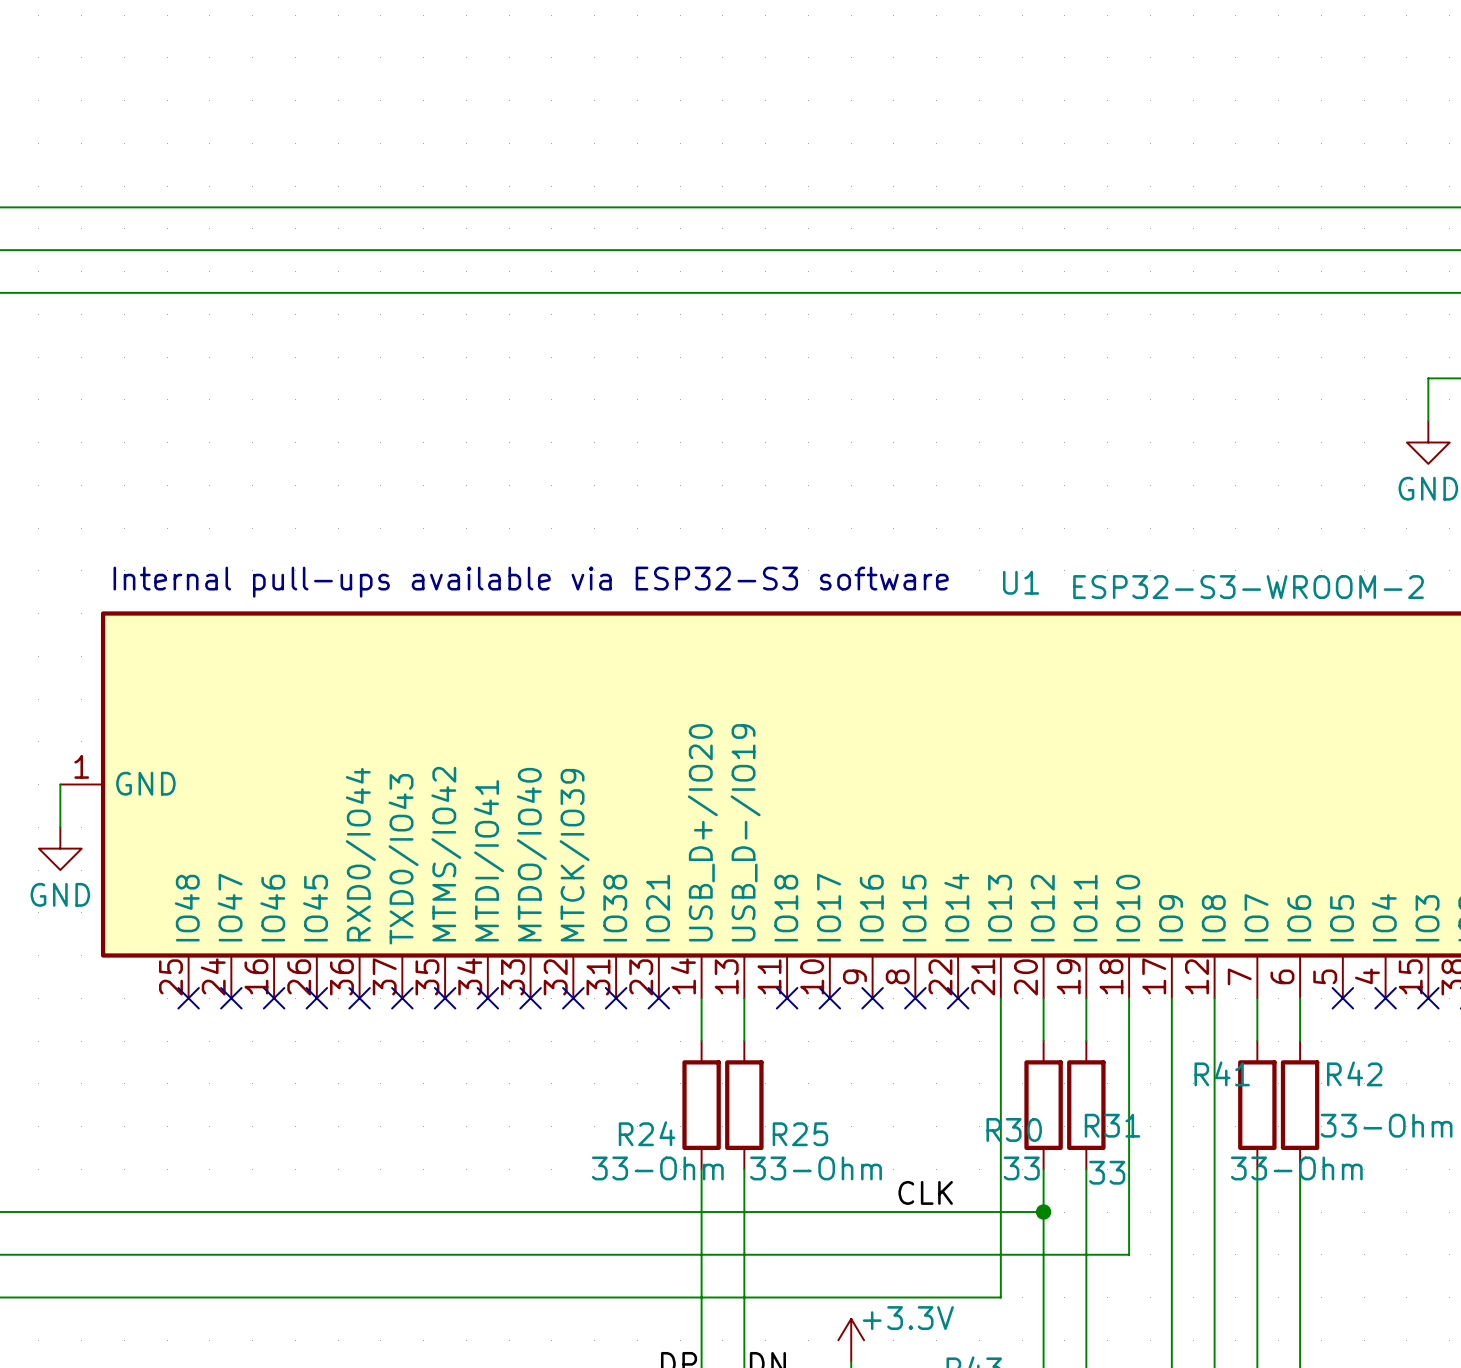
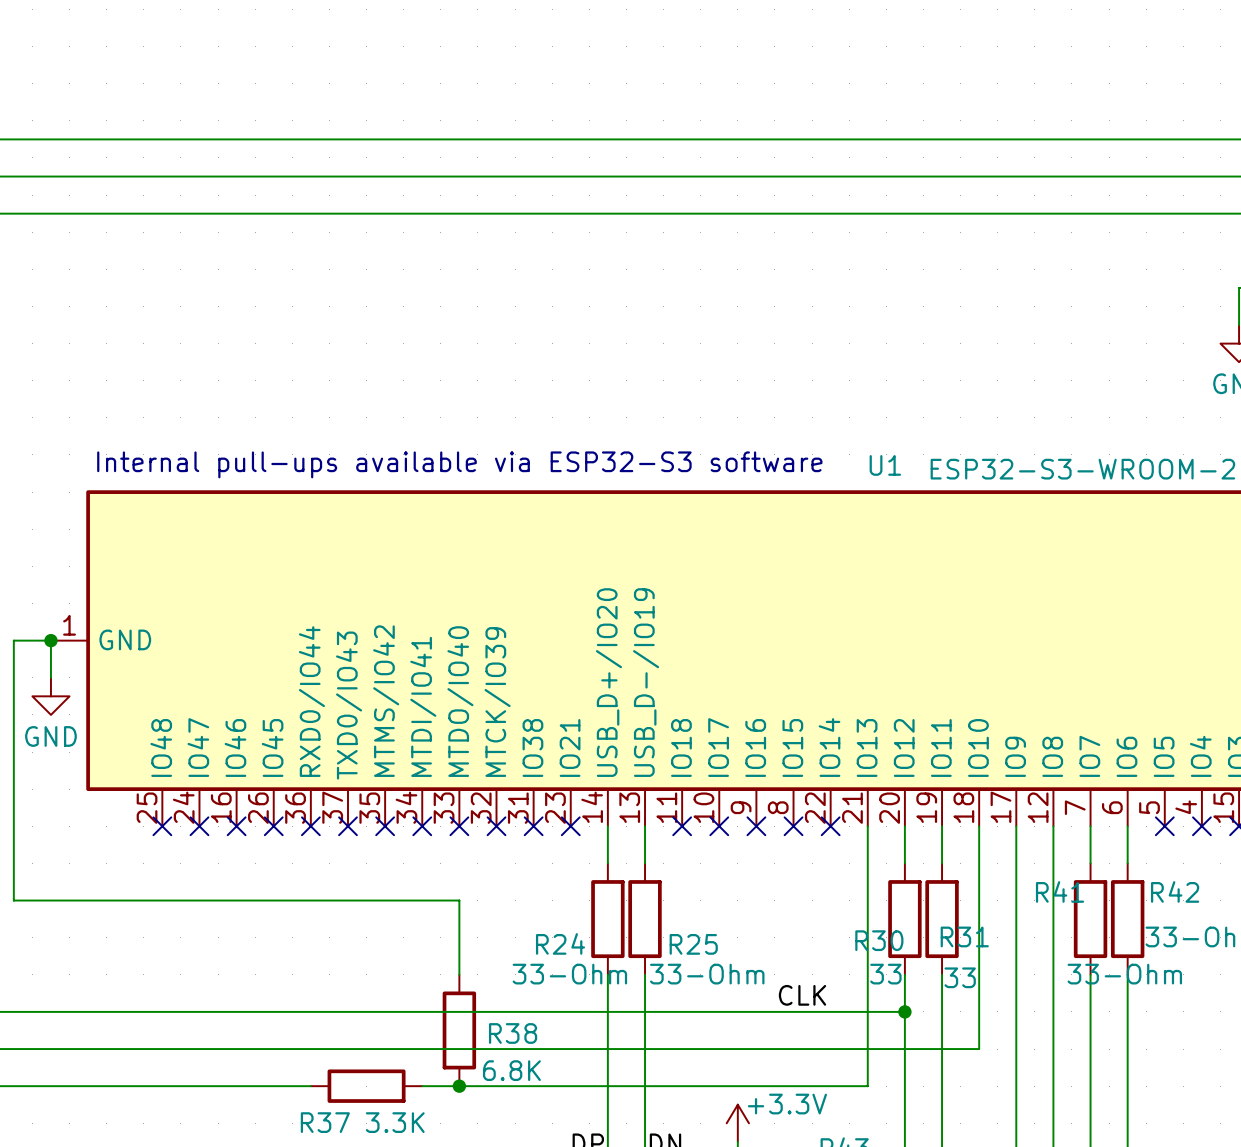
wire: none -> (50, 640) (13, 640) (13, 900) (459, 900) (459, 974)
junction: none -> (50, 640)
R38: none -> 6.8K (459, 1030)
wire: (359, 1297) (487, 1297) -> none
R37: none -> 3.3K (366, 1086)
junction: none -> (459, 1086)

